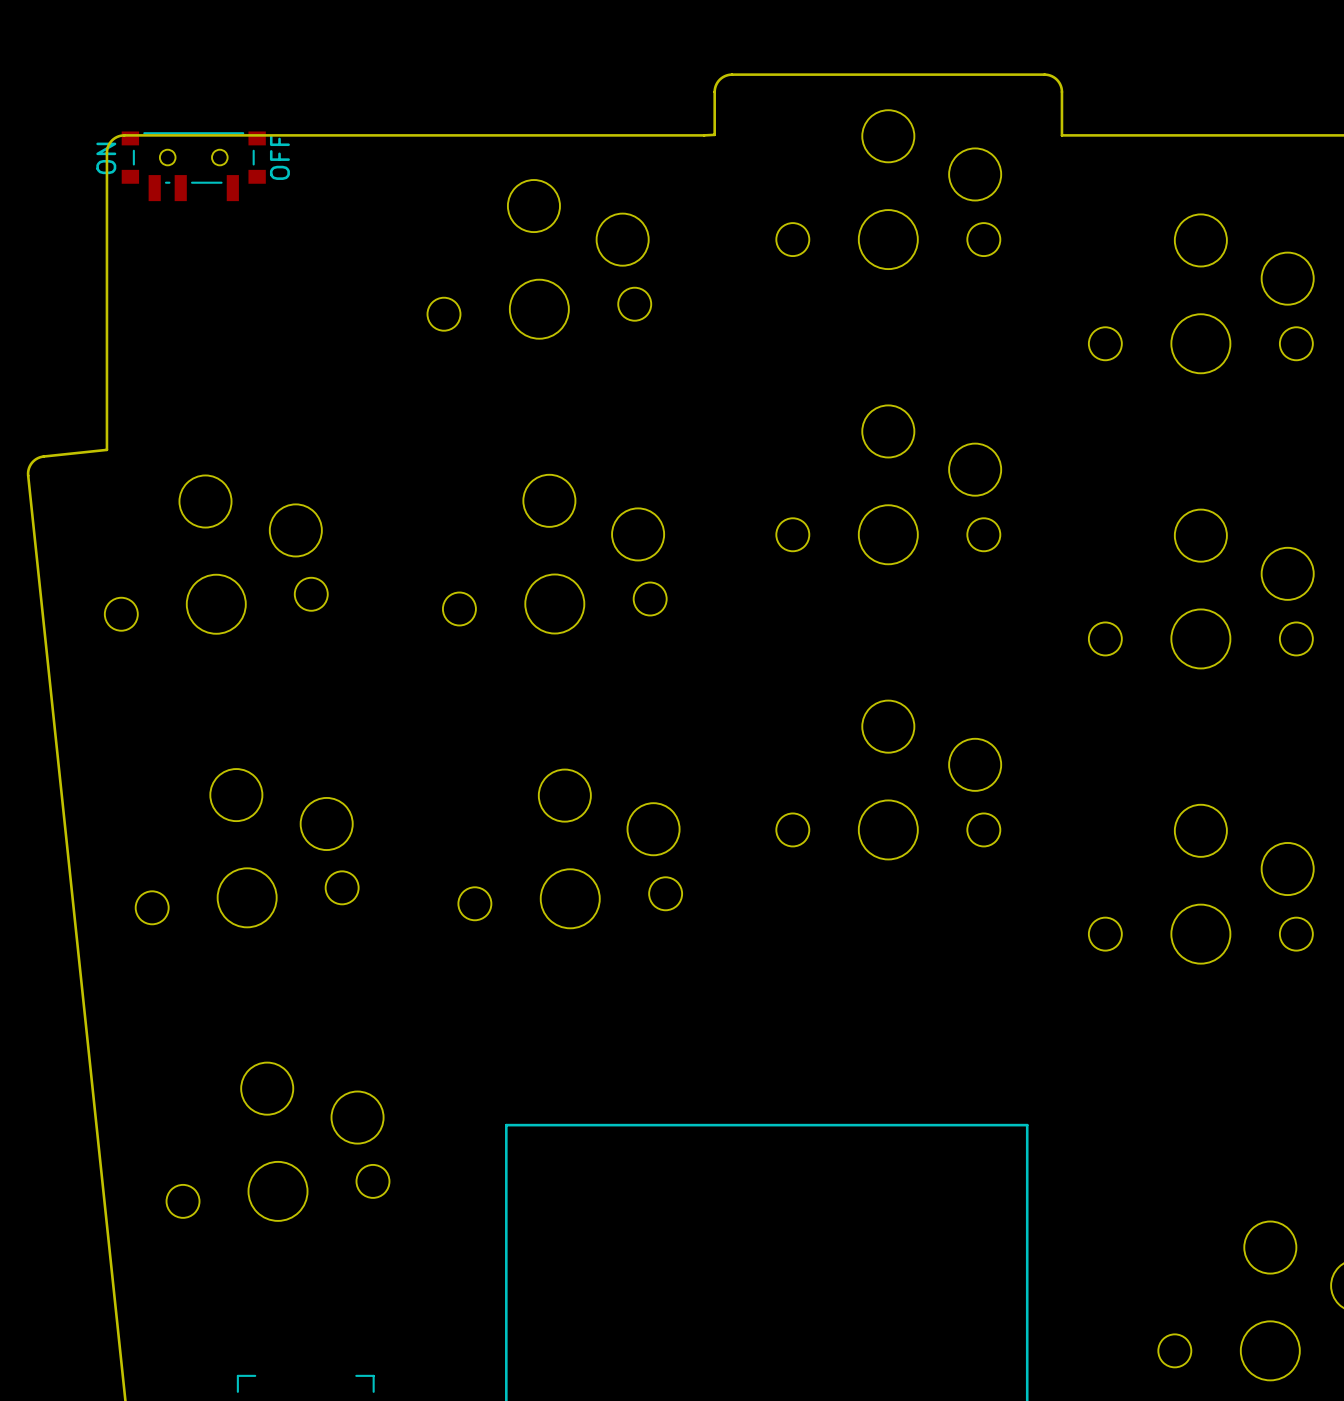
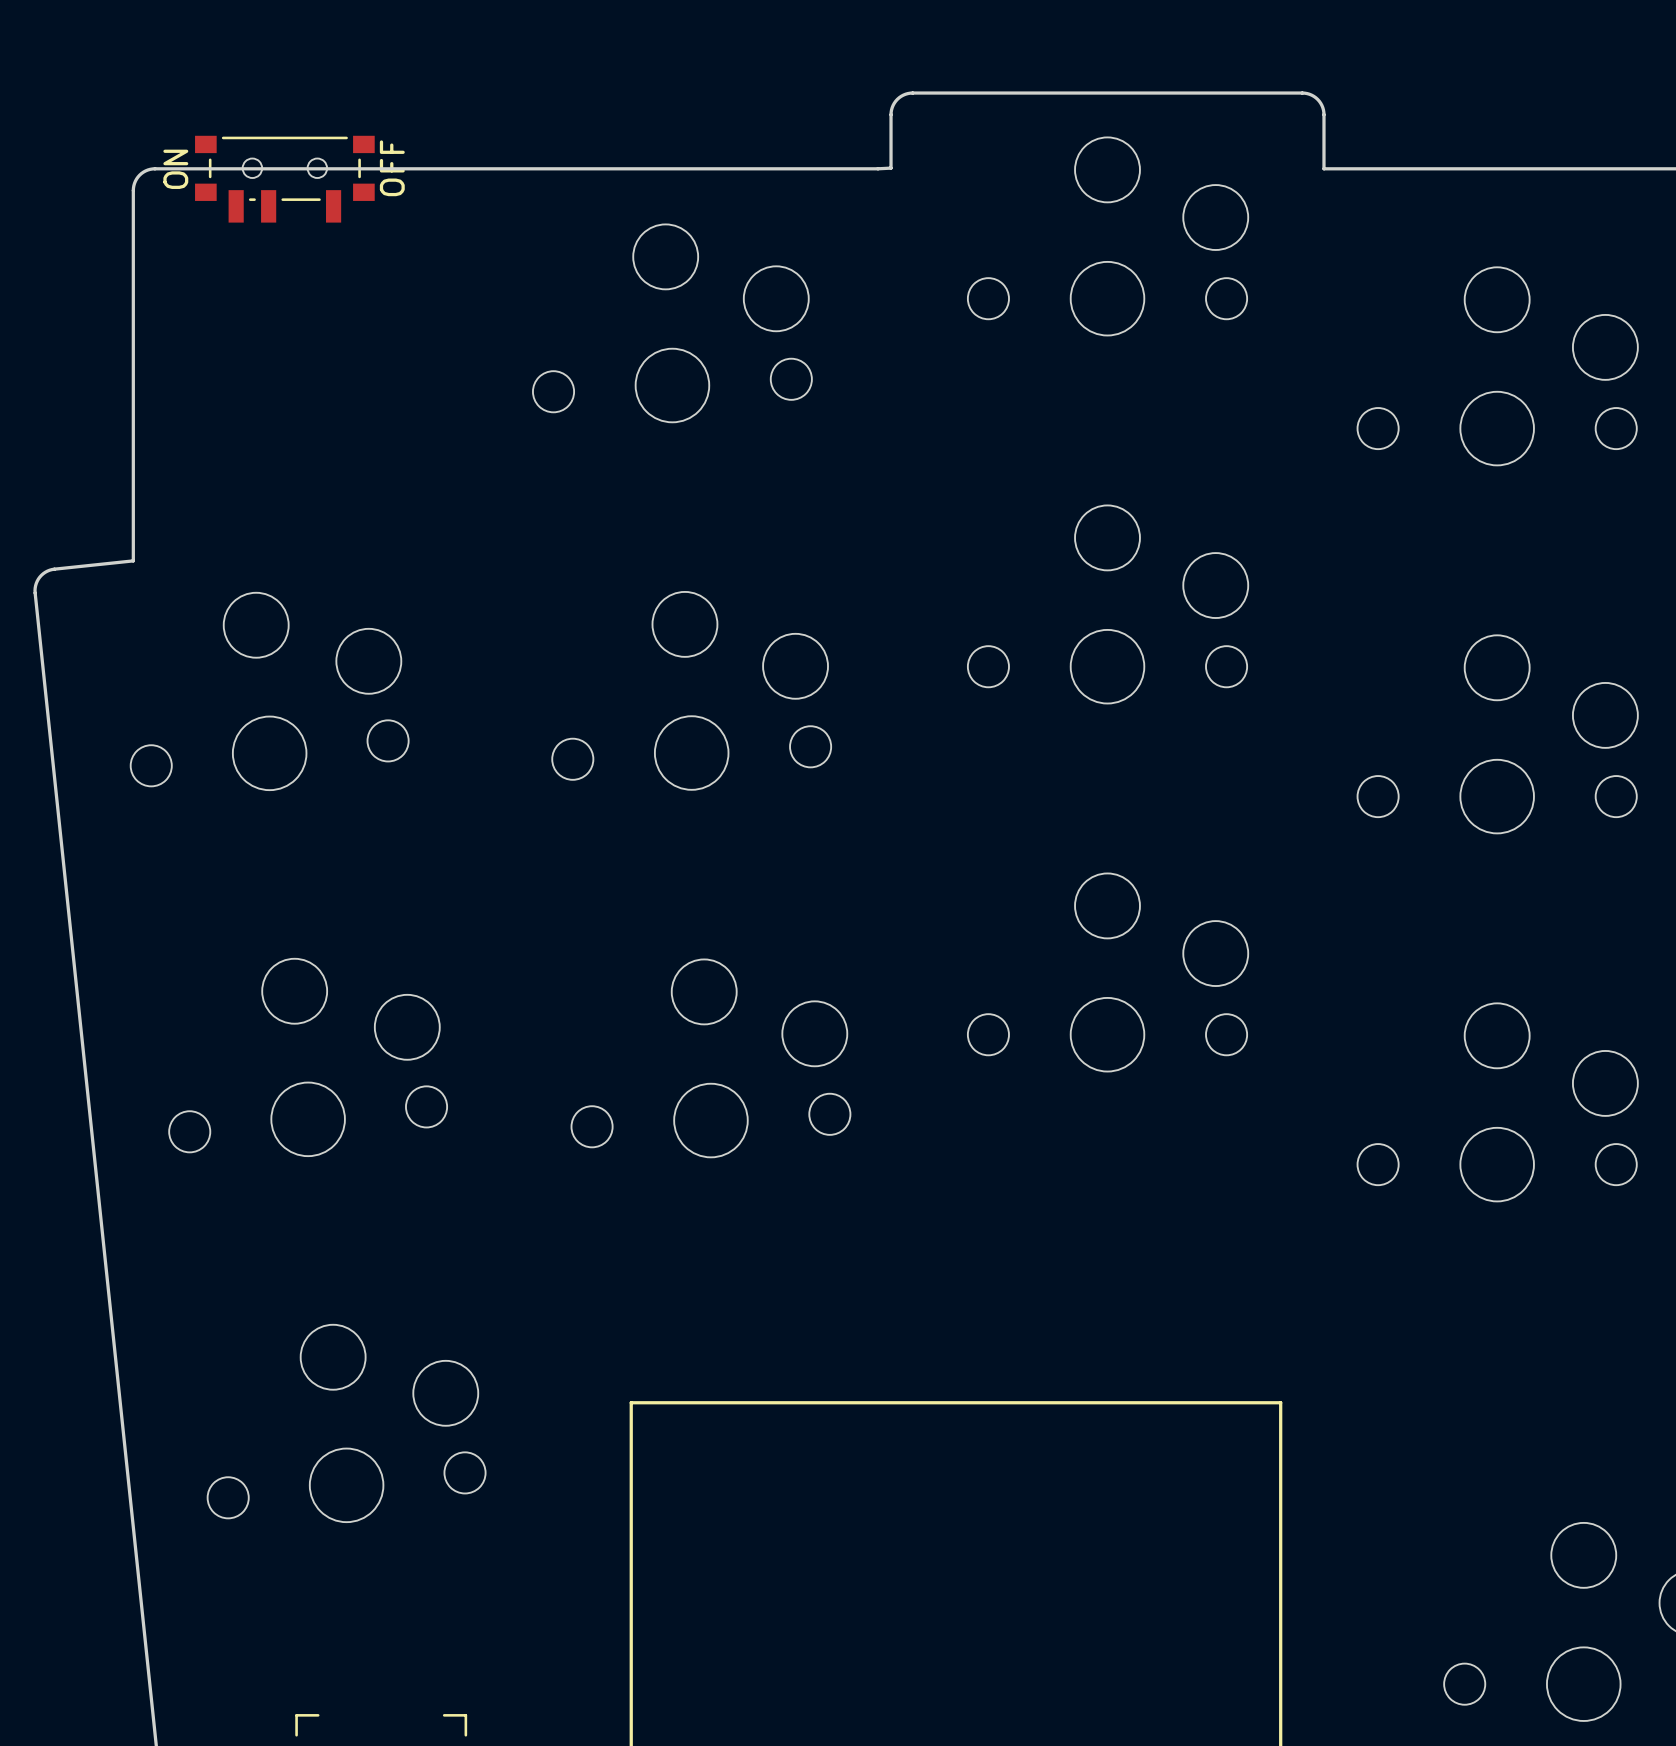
part position: (193, 166) -> (284, 179)

